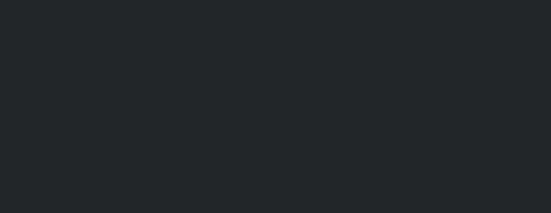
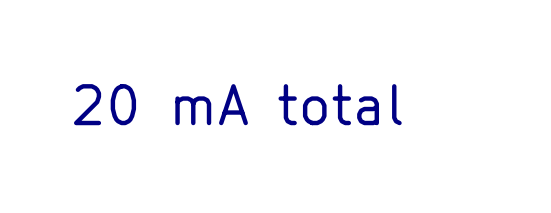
text: none -> 20 mA total (237, 104)

